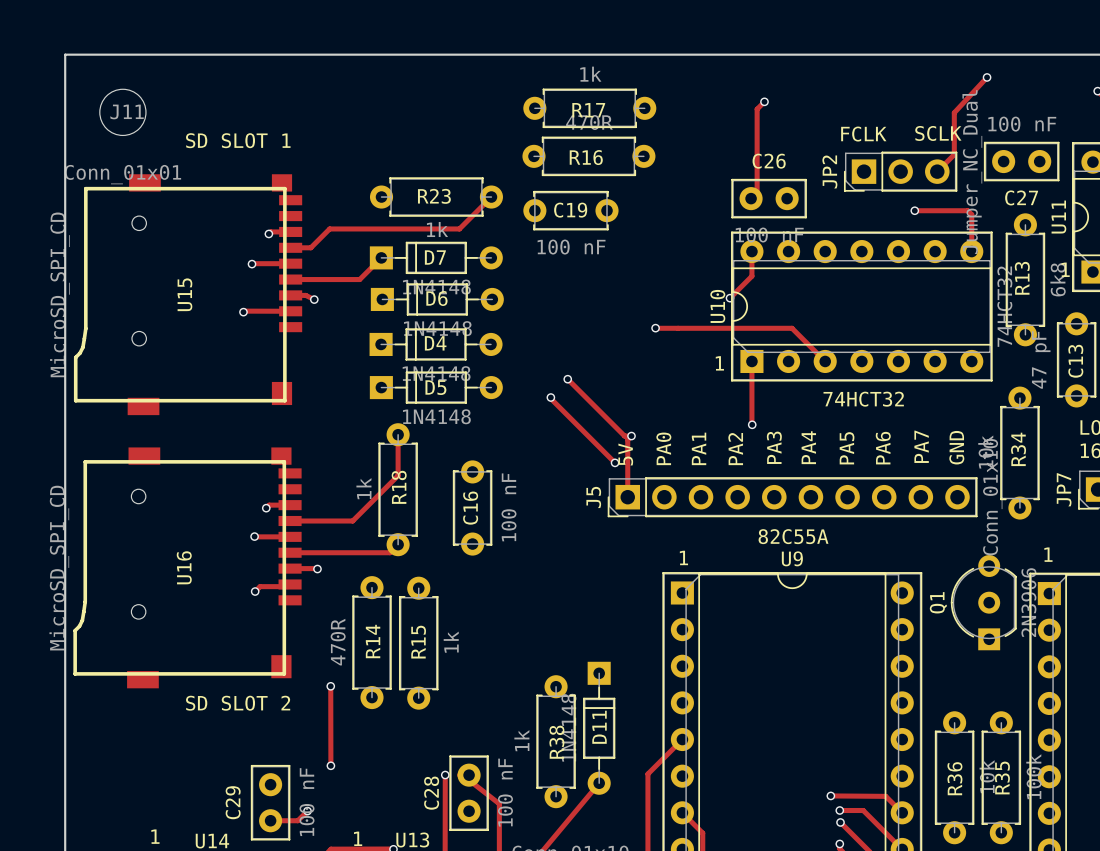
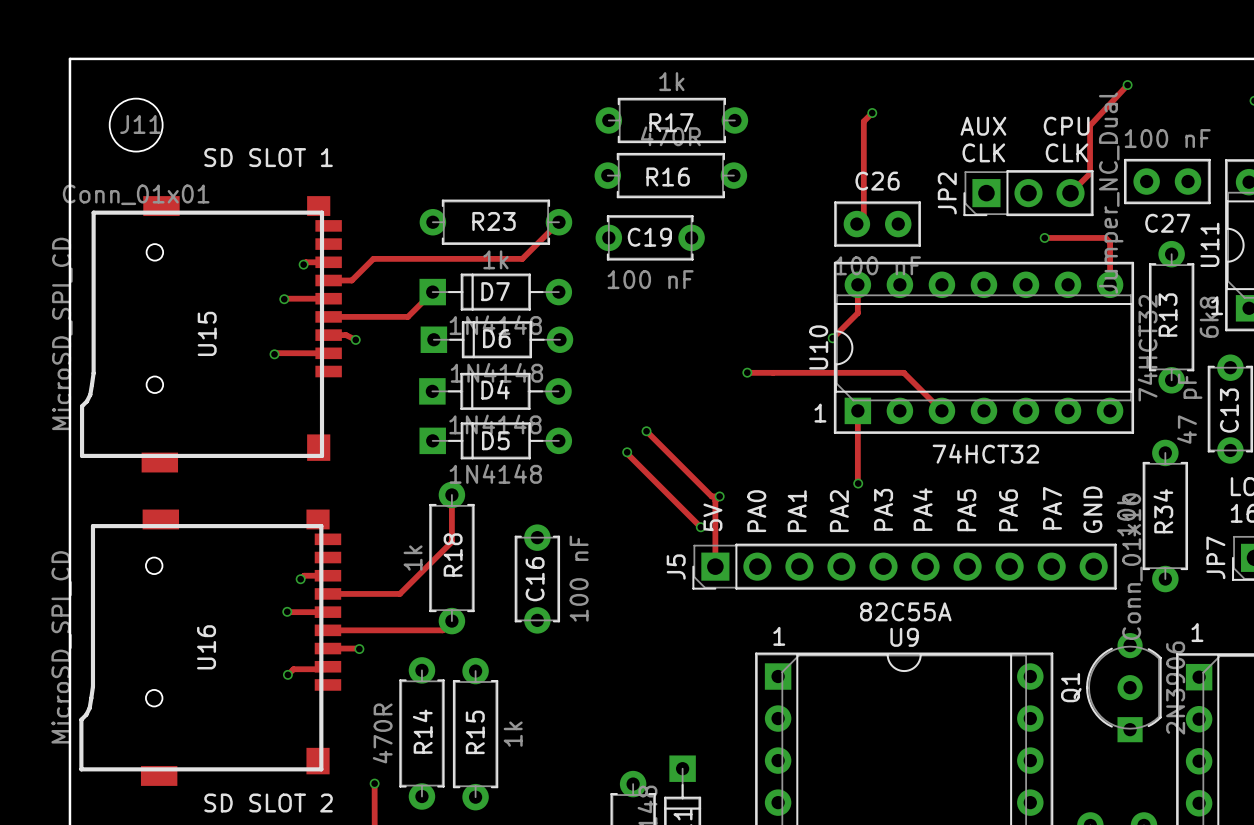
text: none -> AUX (983, 126)
text: none -> CPU (1066, 126)
text: SCLK (938, 133) -> CLK (1067, 152)
text: FCLK (863, 134) -> CLK (983, 152)

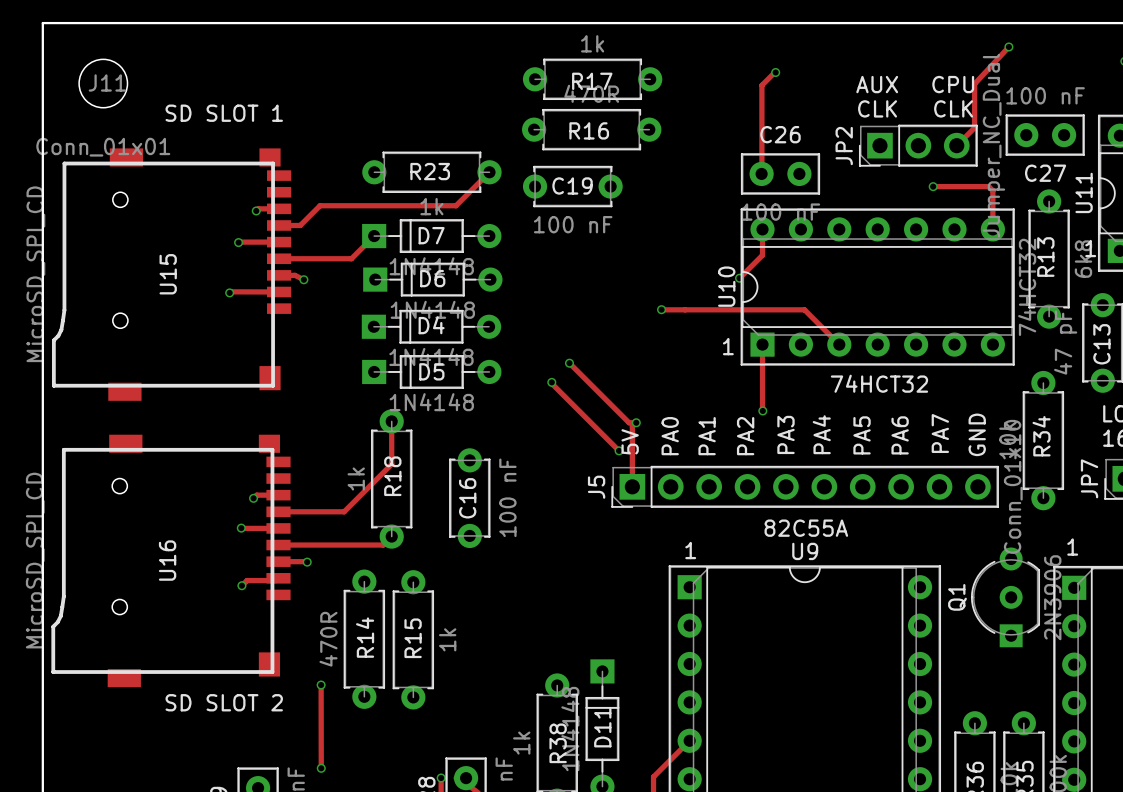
track: none -> (774, 72) (761, 85) (761, 173)
track: (872, 113) (863, 121) (863, 217) -> none

